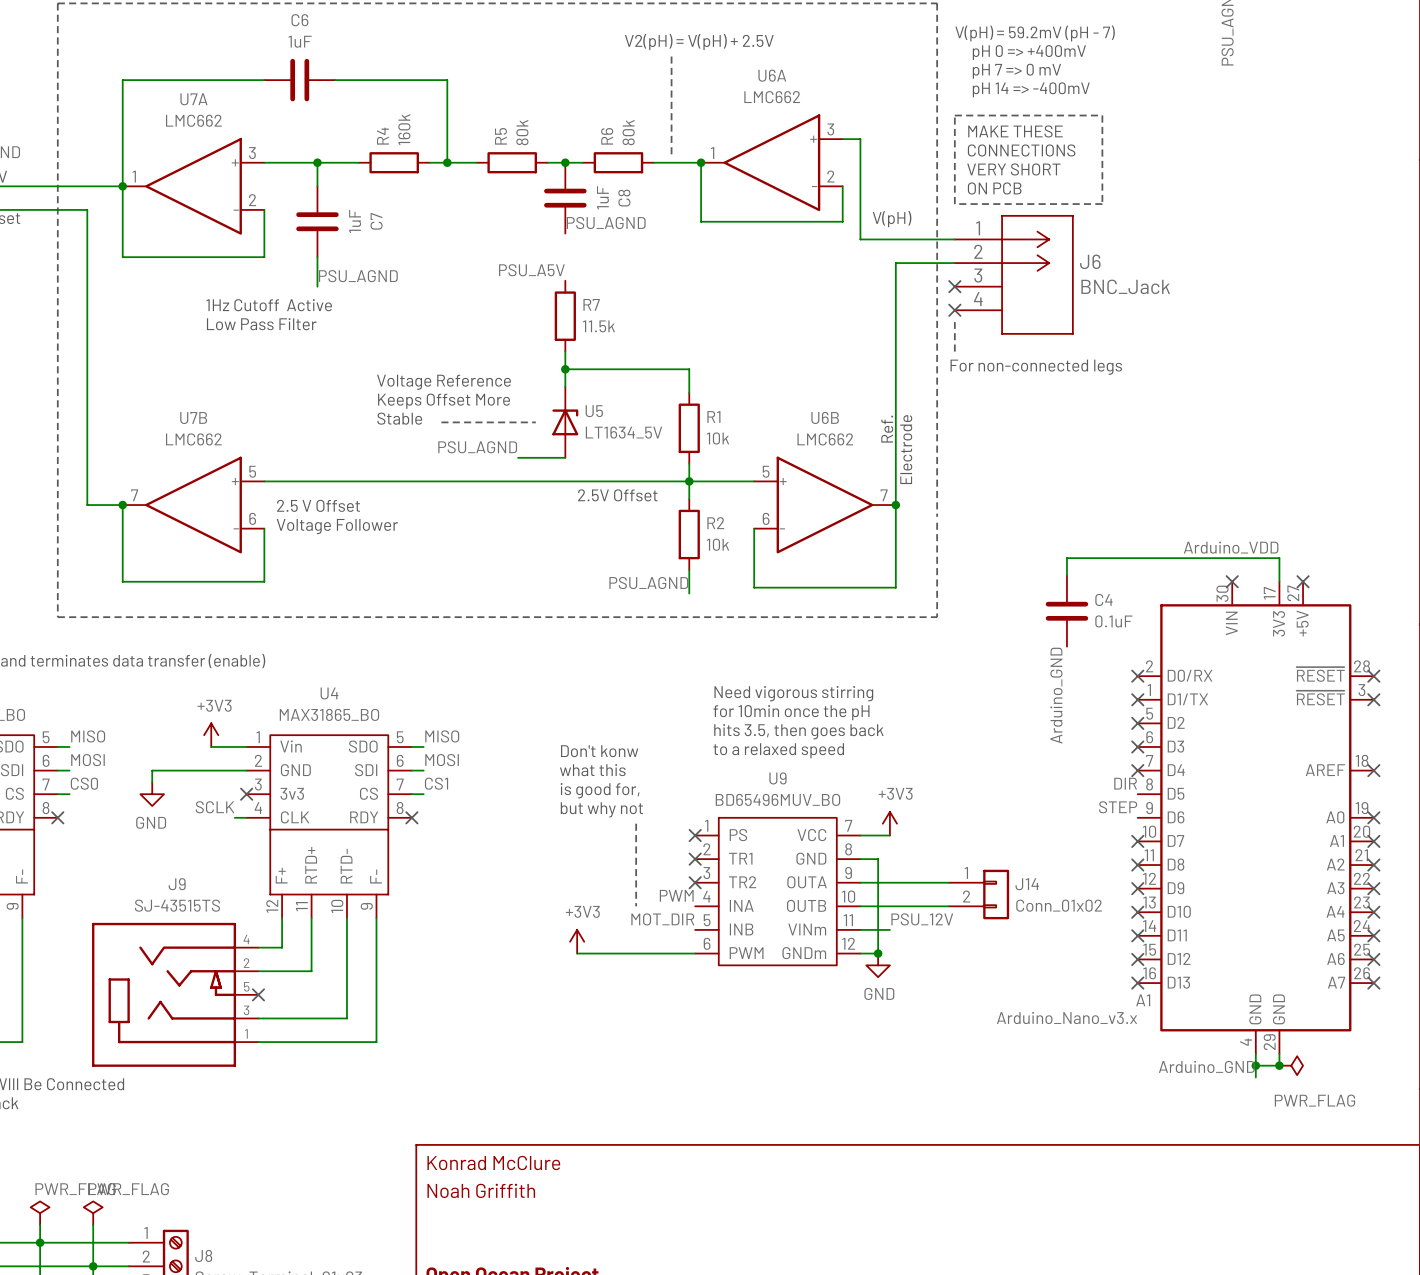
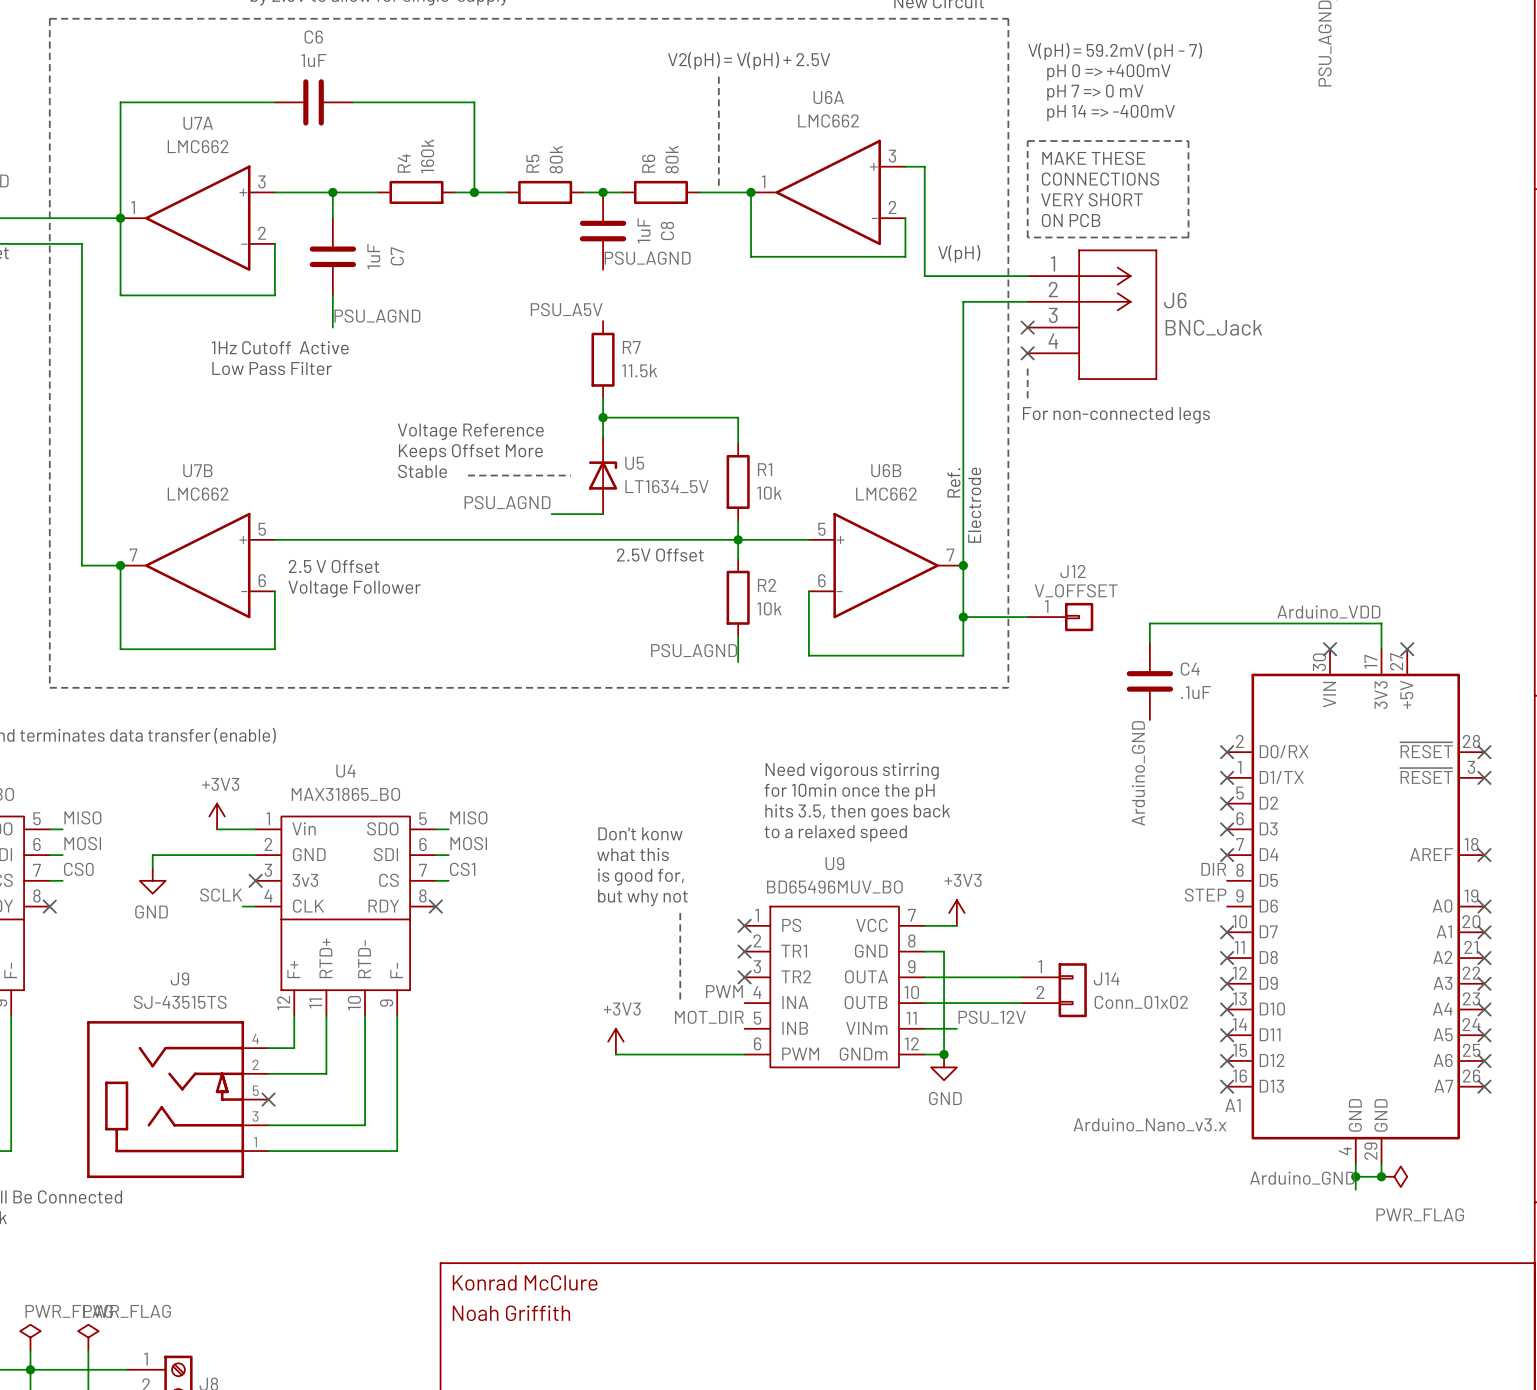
wire: none -> (963, 617) (1027, 617)
junction: none -> (963, 617)
J12: none -> V_OFFSET (1060, 617)
C4 value: 0.1uF (1113, 621) -> .1uF (1195, 692)

